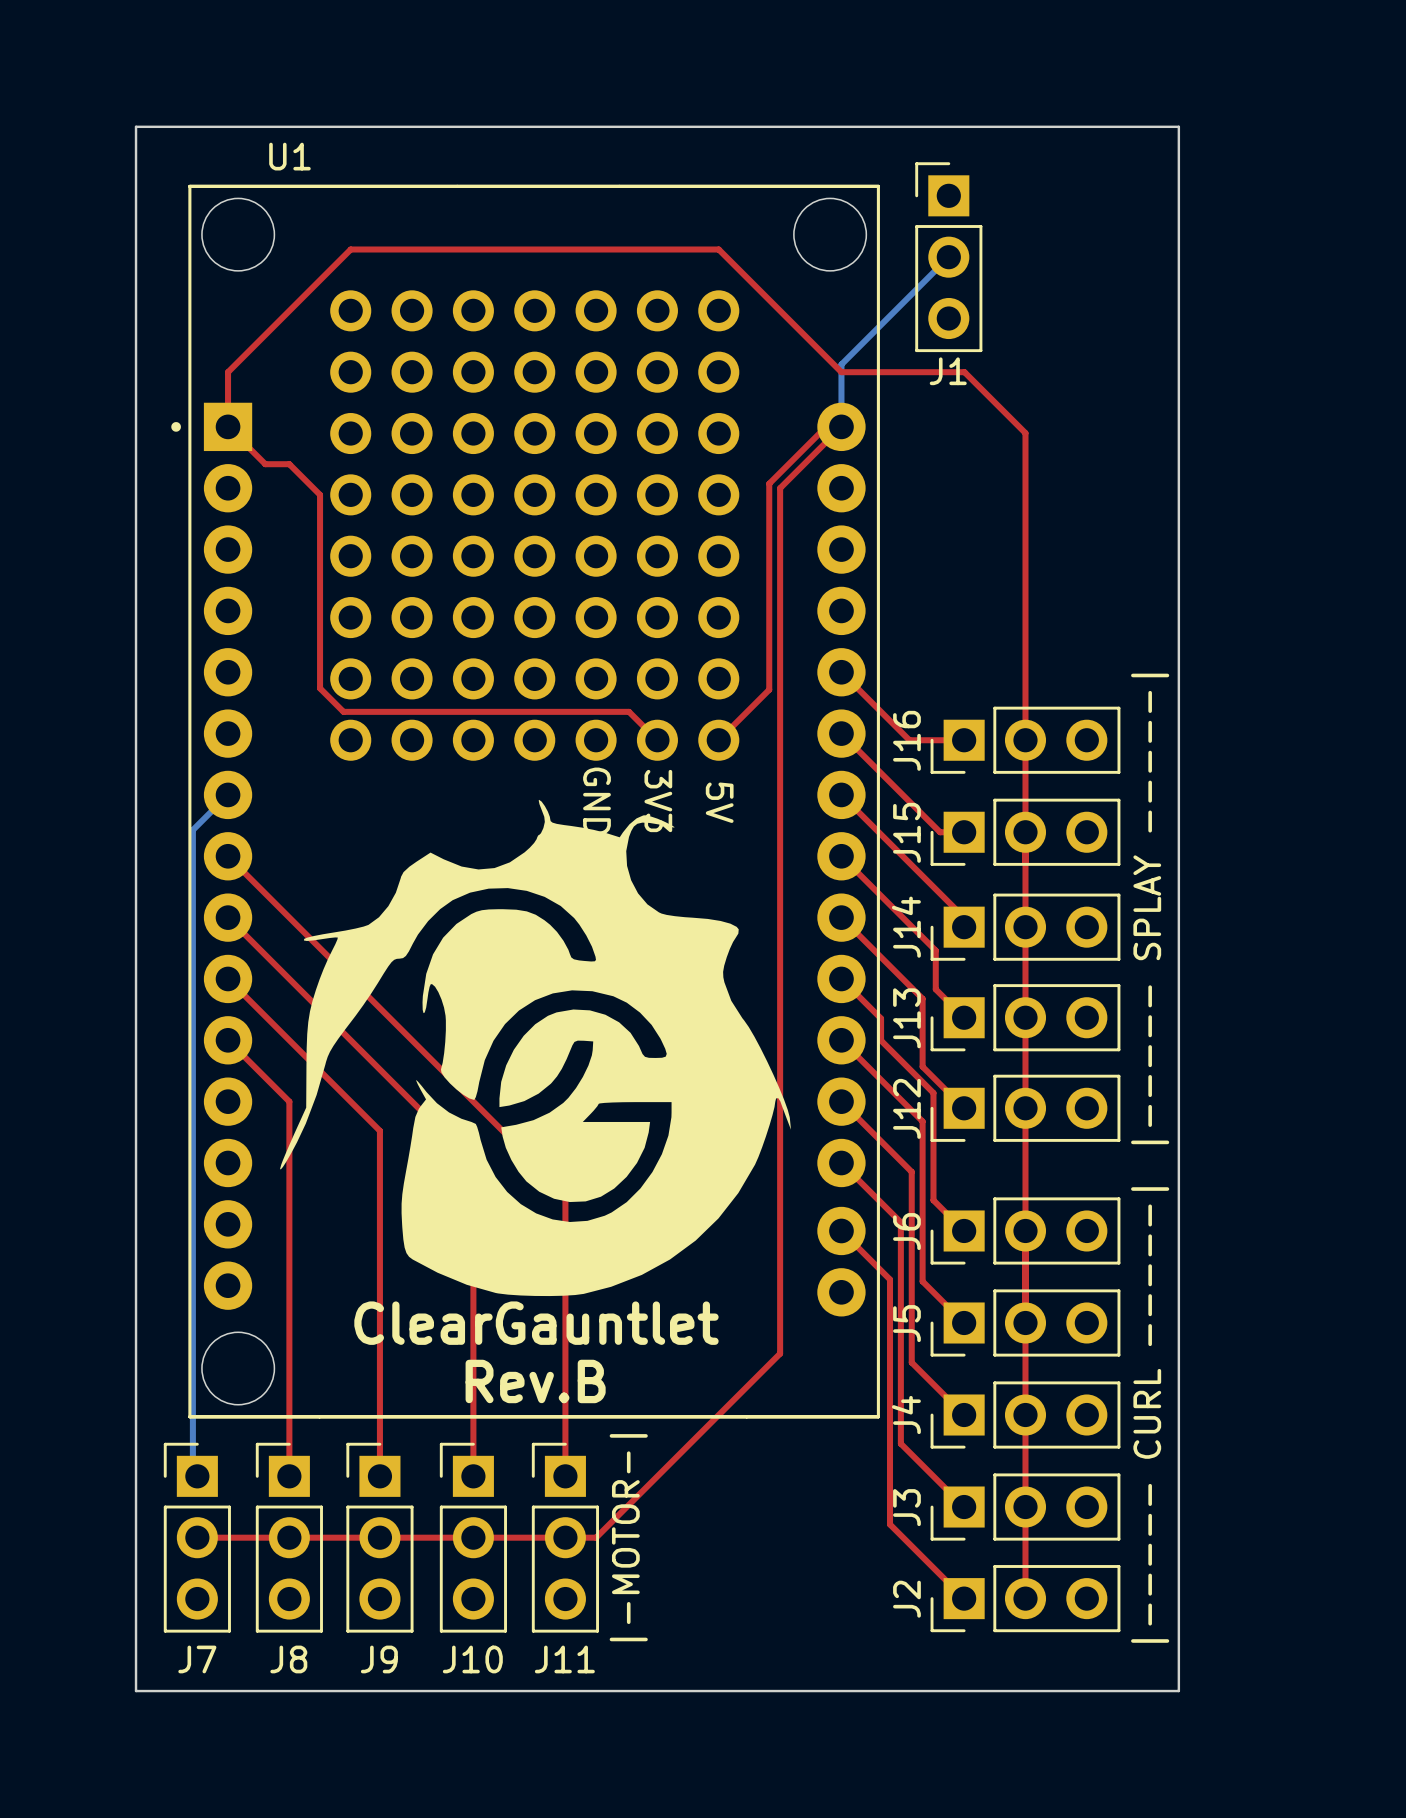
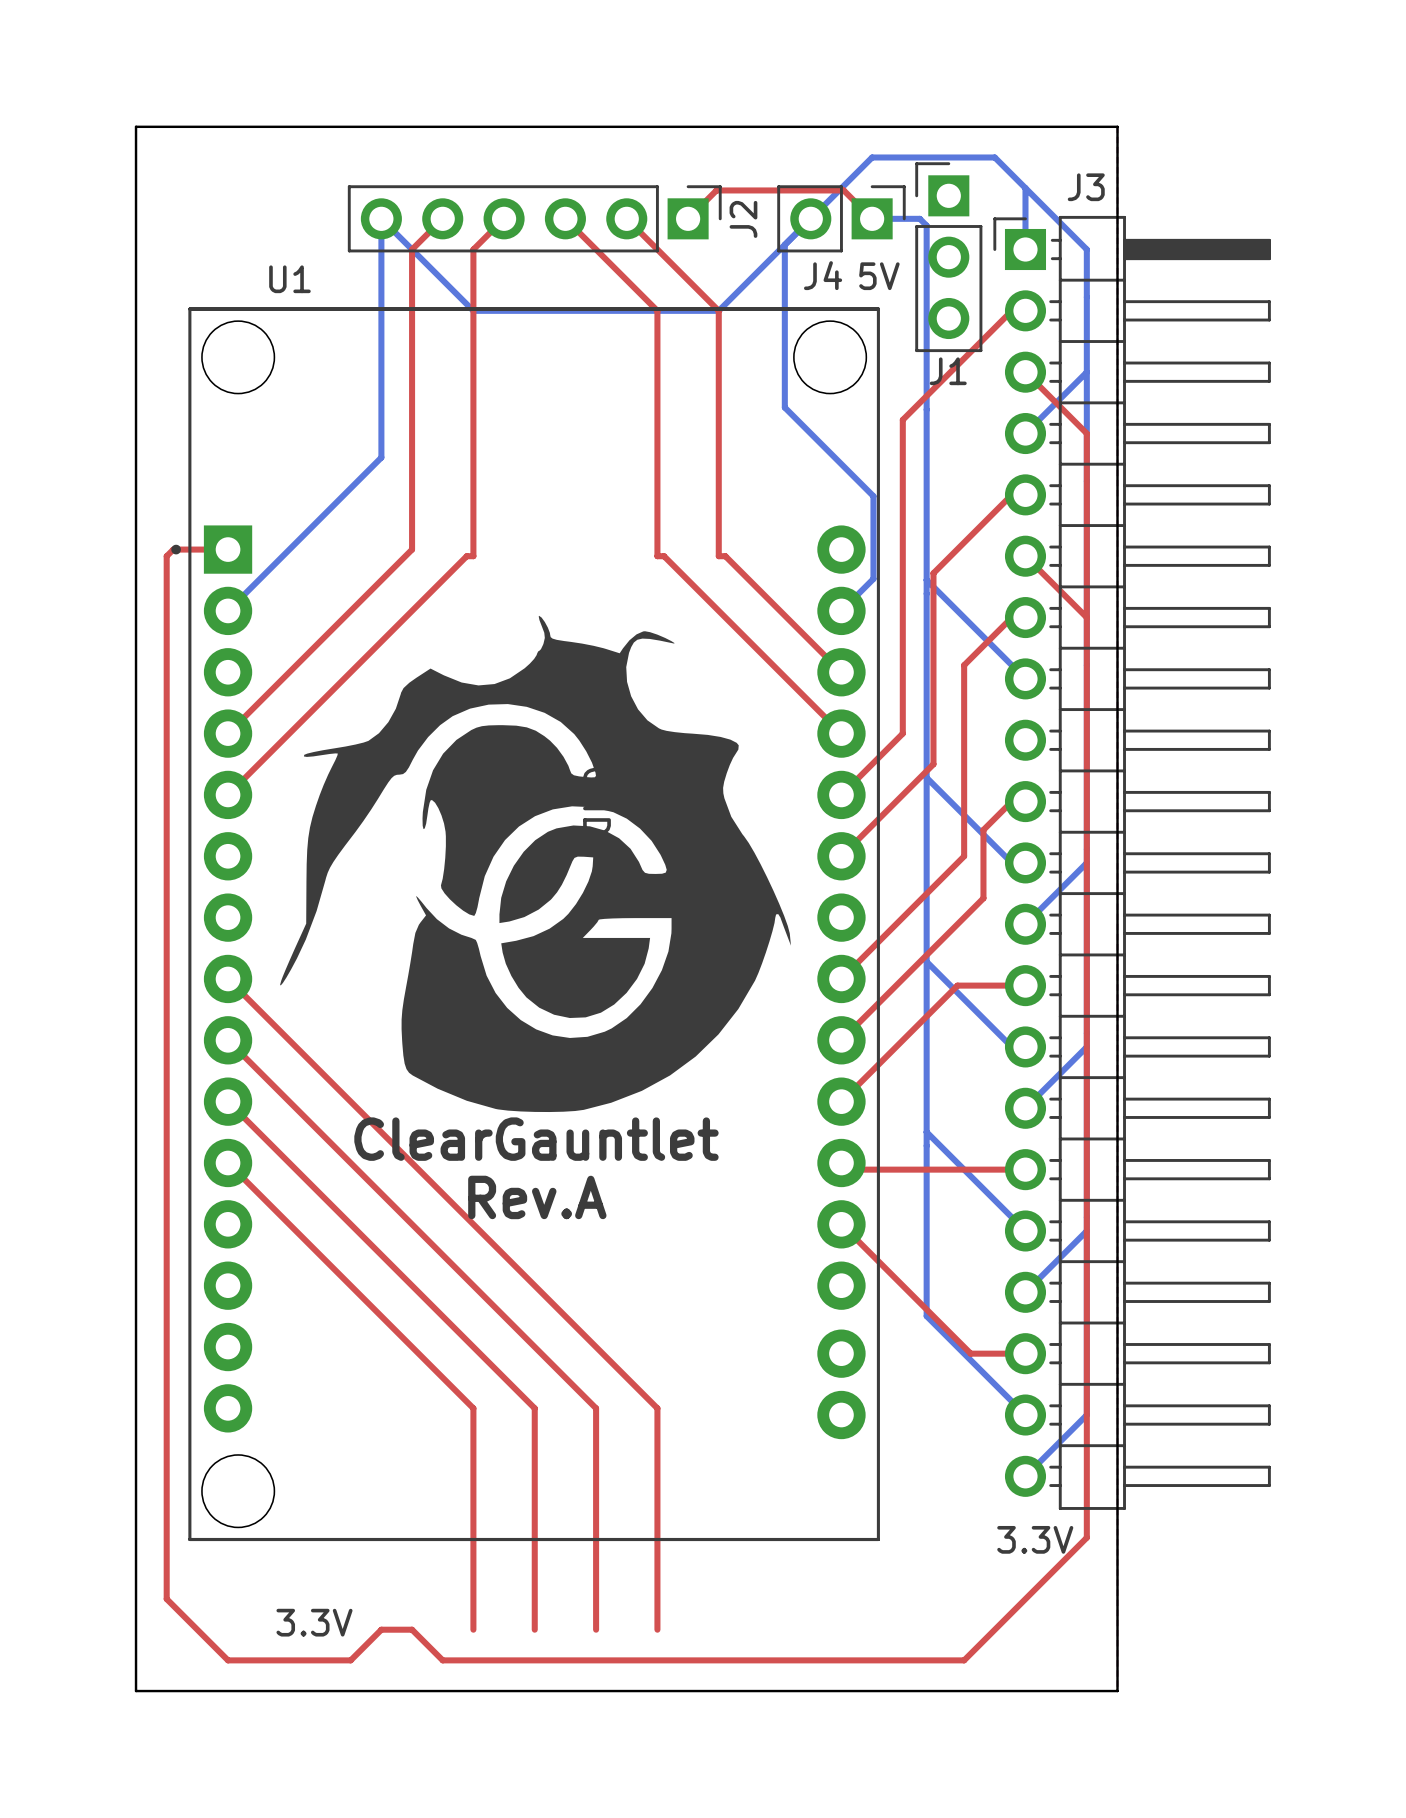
board edge: (1117, 126) (1178, 126) (1178, 1691) (1117, 1691) -> (1117, 126) (1117, 1691)
bottom track: none -> (1025, 188) (1025, 249)
top track: none -> (442, 218) (412, 249) (412, 549) (228, 733)
top track: none -> (504, 218) (473, 249) (473, 556) (466, 556) (228, 794)
top track: none -> (688, 218) (716, 190) (843, 190) (872, 218)
bottom track: none -> (872, 218) (919, 218) (926, 225) (926, 1316) (1025, 1415)
bottom track: none -> (784, 244) (784, 407) (873, 496) (873, 578) (841, 610)
bottom track: (948, 257) (841, 364) (841, 426) -> none
part: (350, 310) -> none
part: (412, 310) -> none
part: (473, 310) -> none
part: (534, 310) -> none
part: (596, 310) -> none
part: (657, 310) -> none
part: (718, 310) -> none
part: (350, 372) -> none
part: (412, 372) -> none
part: (473, 372) -> none
part: (534, 372) -> none
part: (596, 372) -> none
part: (657, 372) -> none
part: (718, 372) -> none
top track: none -> (1025, 372) (1086, 433) (1086, 1537) (964, 1660) (442, 1660) (412, 1629) (381, 1629) (350, 1660) (228, 1660) (166, 1599) (166, 556) (173, 549) (228, 549)
bottom track: none -> (1086, 372) (1025, 433)
top track: (833, 419) (769, 483) (769, 689) (718, 740) -> none
top track: (228, 426) (228, 372) (350, 249) (718, 249) (841, 372) (964, 372) (1025, 433) (1025, 1598) -> none
top track: (841, 426) (780, 488) (780, 1353) (596, 1537) (197, 1537) -> none
part: (350, 433) -> none
part: (412, 433) -> none
part: (473, 433) -> none
part: (534, 433) -> none
part: (596, 433) -> none
part: (657, 433) -> none
part: (718, 433) -> none
top track: (235, 441) (235, 434) (265, 464) (289, 464) (320, 494) (320, 688) (343, 711) (629, 711) (657, 740) -> none
part: (350, 494) -> none
part: (412, 494) -> none
part: (473, 494) -> none
part: (534, 494) -> none
part: (596, 494) -> none
part: (657, 494) -> none
part: (718, 494) -> none
part: (350, 556) -> none
part: (412, 556) -> none
part: (473, 556) -> none
part: (534, 556) -> none
part: (596, 556) -> none
part: (657, 556) -> none
part: (718, 556) -> none
top track: none -> (1025, 556) (1086, 617)
bottom track: none -> (926, 580) (1025, 678)
bottom track: none -> (228, 610) (381, 457) (381, 218) (473, 310) (718, 310) (872, 157) (994, 157) (1086, 249) (1086, 1415) (1025, 1476)
part: (350, 617) -> none
part: (412, 617) -> none
part: (473, 617) -> none
part: (534, 617) -> none
part: (596, 617) -> none
part: (657, 617) -> none
part: (718, 617) -> none
top track: (841, 672) (909, 740) (964, 740) -> (841, 672) (725, 556) (718, 556) (718, 310) (626, 218)
part: (350, 678) -> none
part: (412, 678) -> none
part: (473, 678) -> none
part: (534, 678) -> none
part: (596, 678) -> none
part: (657, 678) -> none
part: (718, 678) -> none
top track: (841, 733) (940, 832) (964, 832) -> (841, 733) (664, 556) (657, 556) (657, 310) (565, 218)
part: (350, 740) -> none
part: (412, 740) -> none
part: (473, 740) -> none
part: (534, 740) -> none
part: (596, 740) -> none
part: (657, 740) -> none
part: (718, 740) -> none
J16: (1025, 740) -> none
bottom track: none -> (926, 777) (1011, 862)
bottom track: (228, 794) (192, 830) (192, 1471) (197, 1476) -> none
top track: (841, 794) (964, 917) (964, 927) -> (841, 794) (902, 733) (902, 419) (1011, 310) (1025, 310)
U1 position: (525, 801) -> (525, 924)
text rotation: 0° (719, 802) -> 90° counterclockwise (879, 276)
text position: 5V (719, 802) -> 5V (879, 276)
J15: (1025, 832) -> none
top track: (228, 856) (565, 1193) (565, 1476) -> none
top track: (841, 856) (935, 950) (935, 989) (964, 1017) -> (841, 856) (933, 764) (933, 573) (1011, 494) (1025, 494)
bottom track: none -> (1086, 862) (1025, 924)
text: |----- SPLAY -----| (1150, 908) -> none
top track: (228, 917) (473, 1162) (473, 1408) -> (228, 1162) (473, 1408)
top track: (841, 917) (922, 998) (922, 1066) (964, 1108) -> none
J14: (1025, 927) -> none
bottom track: none -> (926, 961) (1011, 1046) (1025, 1046)
top track: (841, 978) (881, 1018) (881, 1040) (933, 1092) (933, 1200) (964, 1230) -> (841, 978) (964, 856) (964, 665) (1011, 617) (1025, 617)
J13: (1025, 1017) -> none
top track: (841, 1040) (922, 1121) (922, 1281) (964, 1322) -> (841, 1040) (983, 898) (983, 829) (1011, 801) (1025, 801)
bottom track: none -> (1086, 1046) (1025, 1108)
drawing position: (535, 1047) -> (535, 863)
top track: none -> (228, 1101) (534, 1408) (534, 1629)
top track: (289, 1101) (289, 1476) -> (289, 1101) (596, 1408) (596, 1629)
top track: (841, 1101) (911, 1171) (911, 1362) (964, 1415) -> (841, 1101) (957, 985) (1025, 985)
J12: (1025, 1108) -> none
top track: (379, 1130) (379, 1476) -> (379, 1130) (657, 1408) (657, 1629)
bottom track: none -> (926, 1132) (1025, 1230)
top track: (848, 1169) (900, 1222) (900, 1443) (964, 1507) -> (848, 1169) (1025, 1169)
text: none -> Rev.A (537, 1197)
top track: none -> (841, 1224) (970, 1353) (1025, 1353)
top track: (841, 1230) (890, 1279) (890, 1524) (964, 1598) -> none
J6: (1025, 1230) -> none
bottom track: none -> (1086, 1230) (1025, 1292)
J5: (1025, 1322) -> none
text position: ClearGauntlet (536, 1323) -> ClearGauntlet (536, 1139)
text: Rev.B (535, 1381) -> none
J4 footprint: [930, 1381, 1121, 1449] -> [777, 185, 906, 253]
J4 name position: J4 (906, 1415) -> J4 (823, 275)
text: |----- CURL -----| (1150, 1415) -> none
J3 footprint: [930, 1473, 1121, 1541] -> [993, 215, 1271, 1510]
top track: none -> (473, 1476) (473, 1629)
J3 name position: J3 (906, 1507) -> J3 (1086, 187)
J7: (197, 1537) -> none
J8: (289, 1537) -> none
J9: (379, 1537) -> none
J10: (473, 1537) -> none
J11: (565, 1537) -> none
text: |-MOTOR-| (628, 1537) -> none
text: none -> 3.3V (1035, 1539)
J2 footprint: [930, 1565, 1121, 1633] -> [347, 185, 722, 253]
J2 name position: J2 (906, 1599) -> J2 (743, 219)
text: none -> 3.3V (314, 1622)

